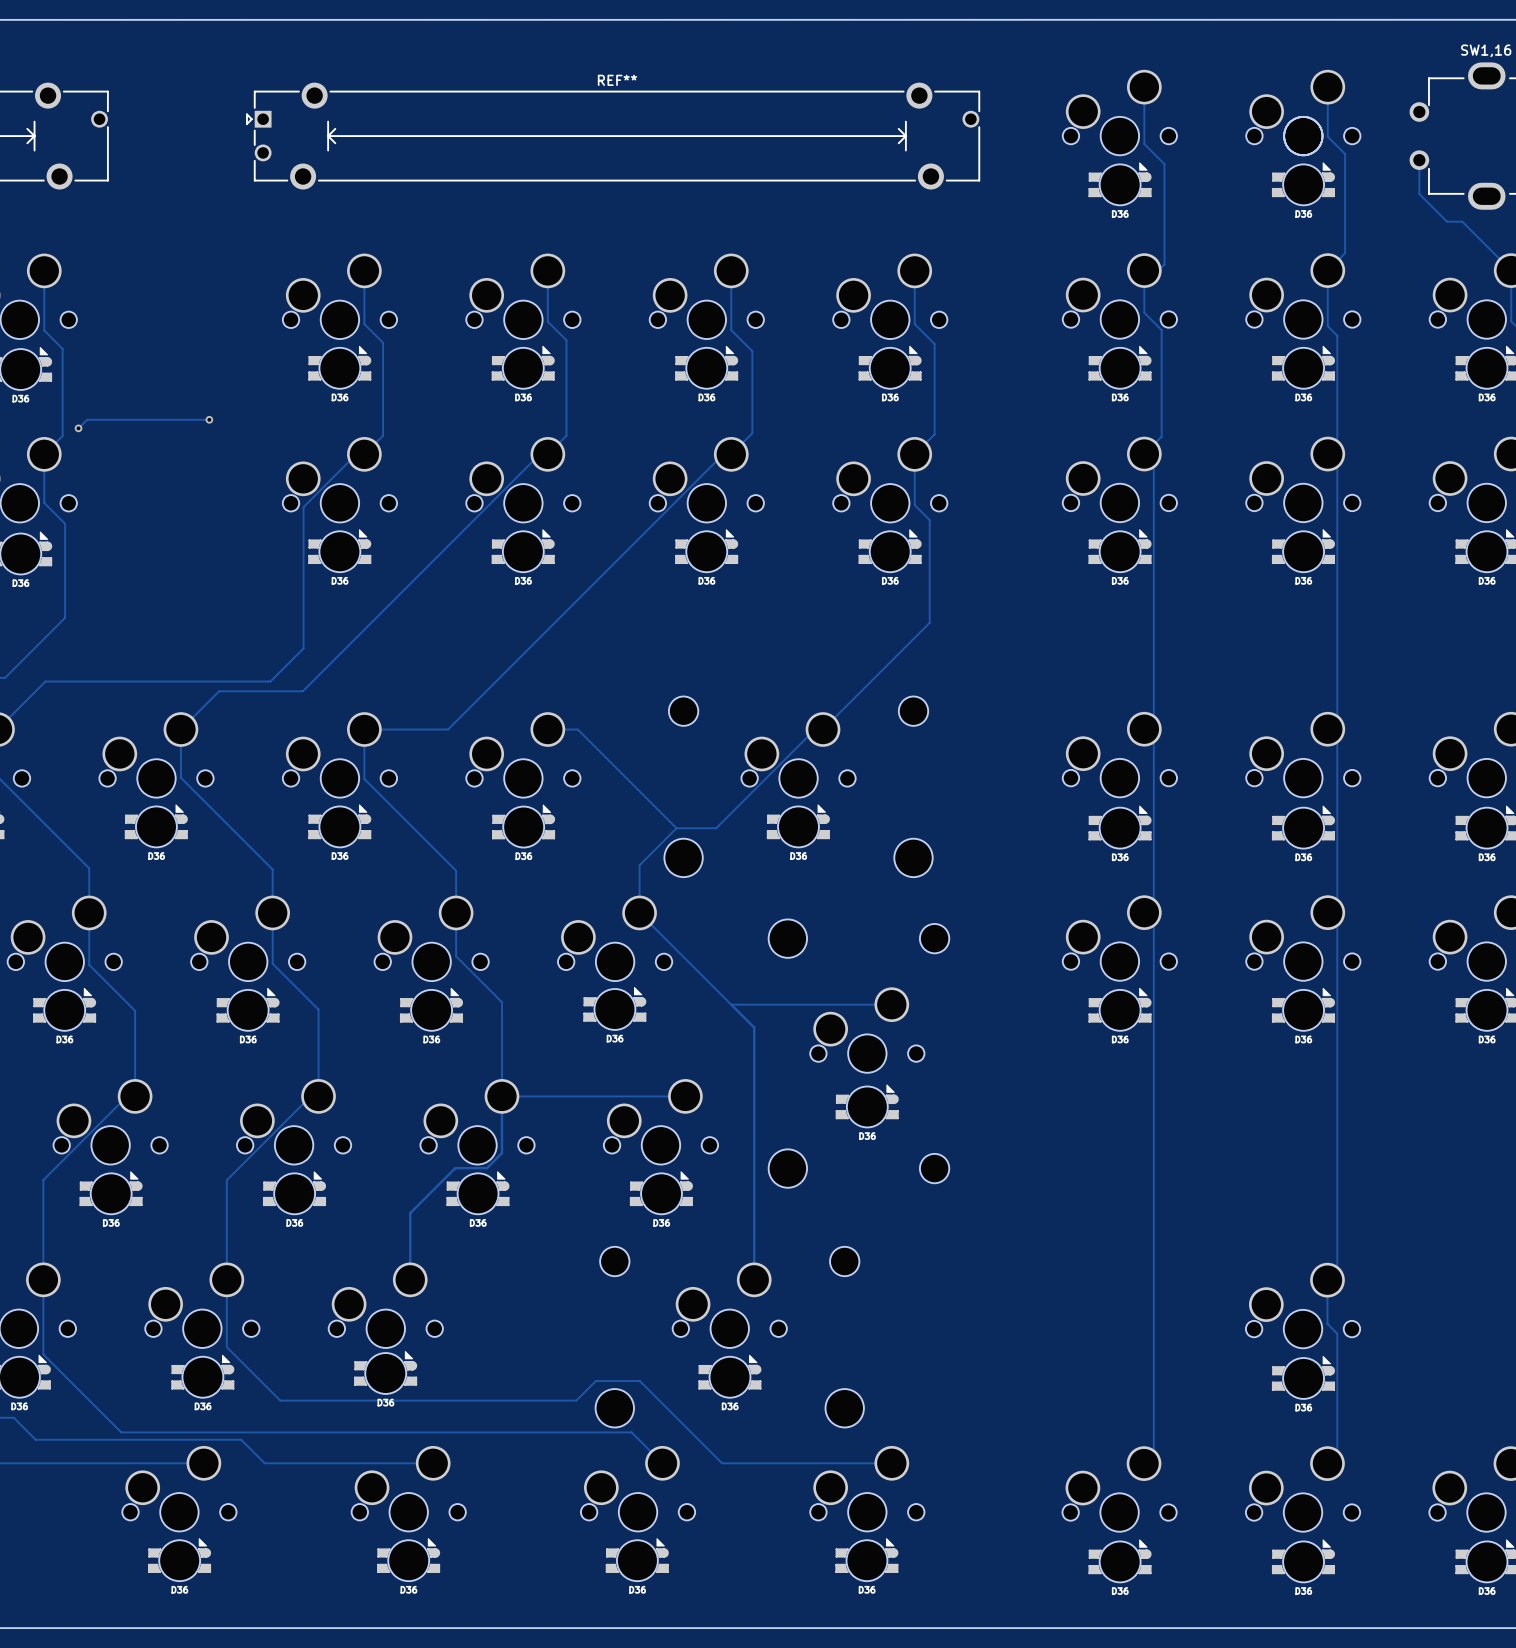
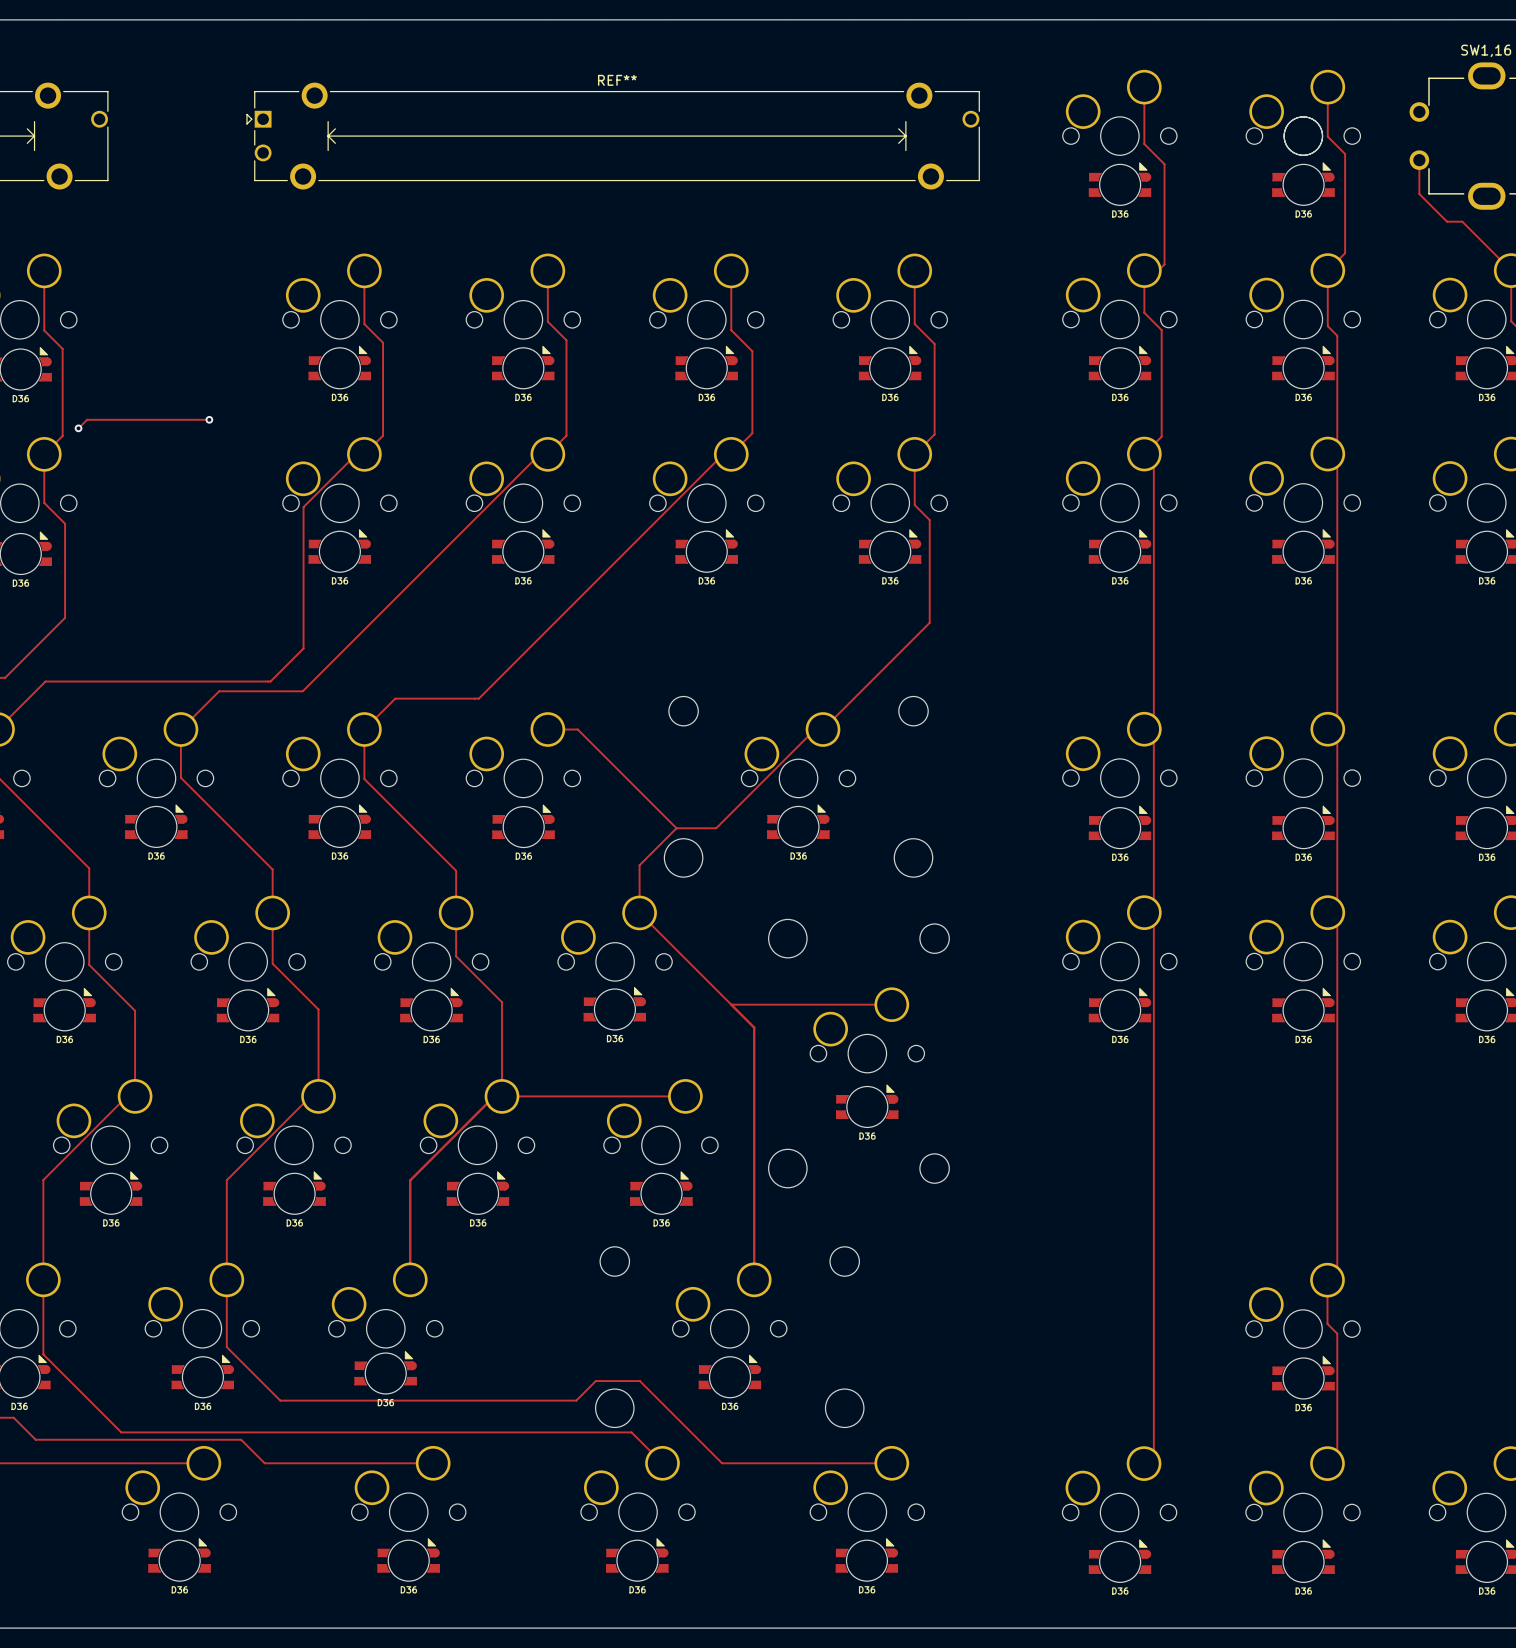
track: (723, 454) (720, 454) (720, 457) (448, 729) (364, 729) -> (723, 454) (478, 698) (395, 698) (364, 729)
track: (501, 1096) (501, 1153) (486, 1168) (455, 1168) (410, 1213) -> (501, 1096) (494, 1096) (410, 1180) (410, 1213)

